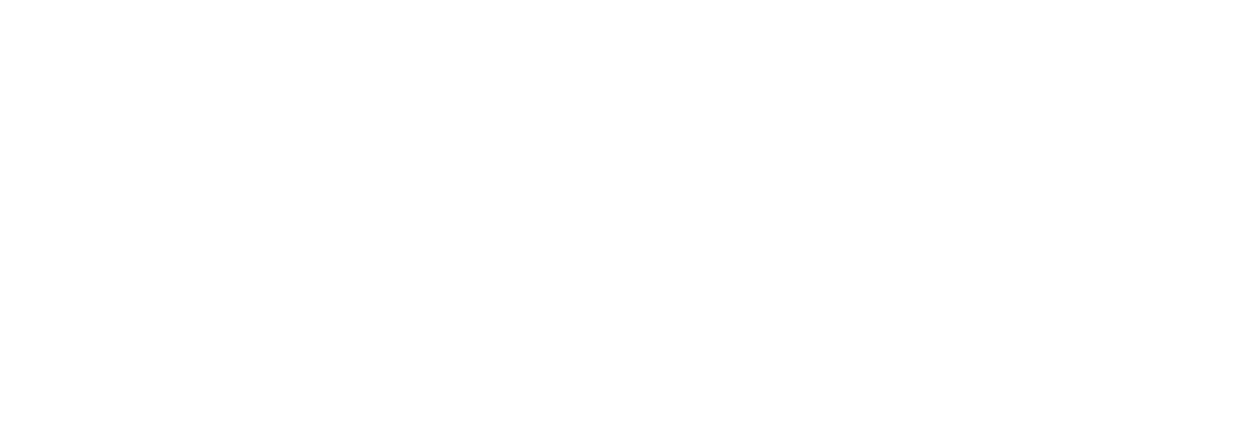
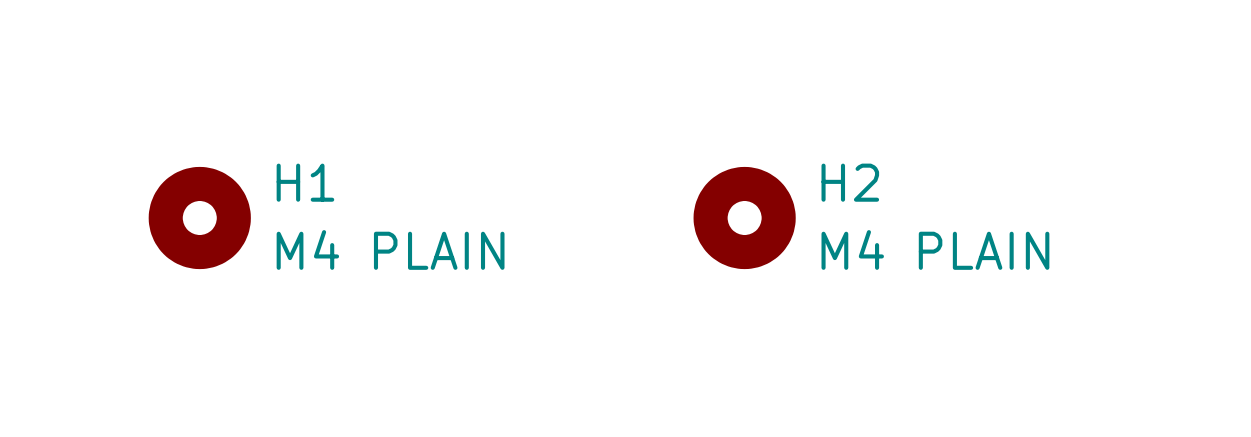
H1: none -> M4 PLAIN (199, 218)
H2: none -> M4 PLAIN (744, 218)

